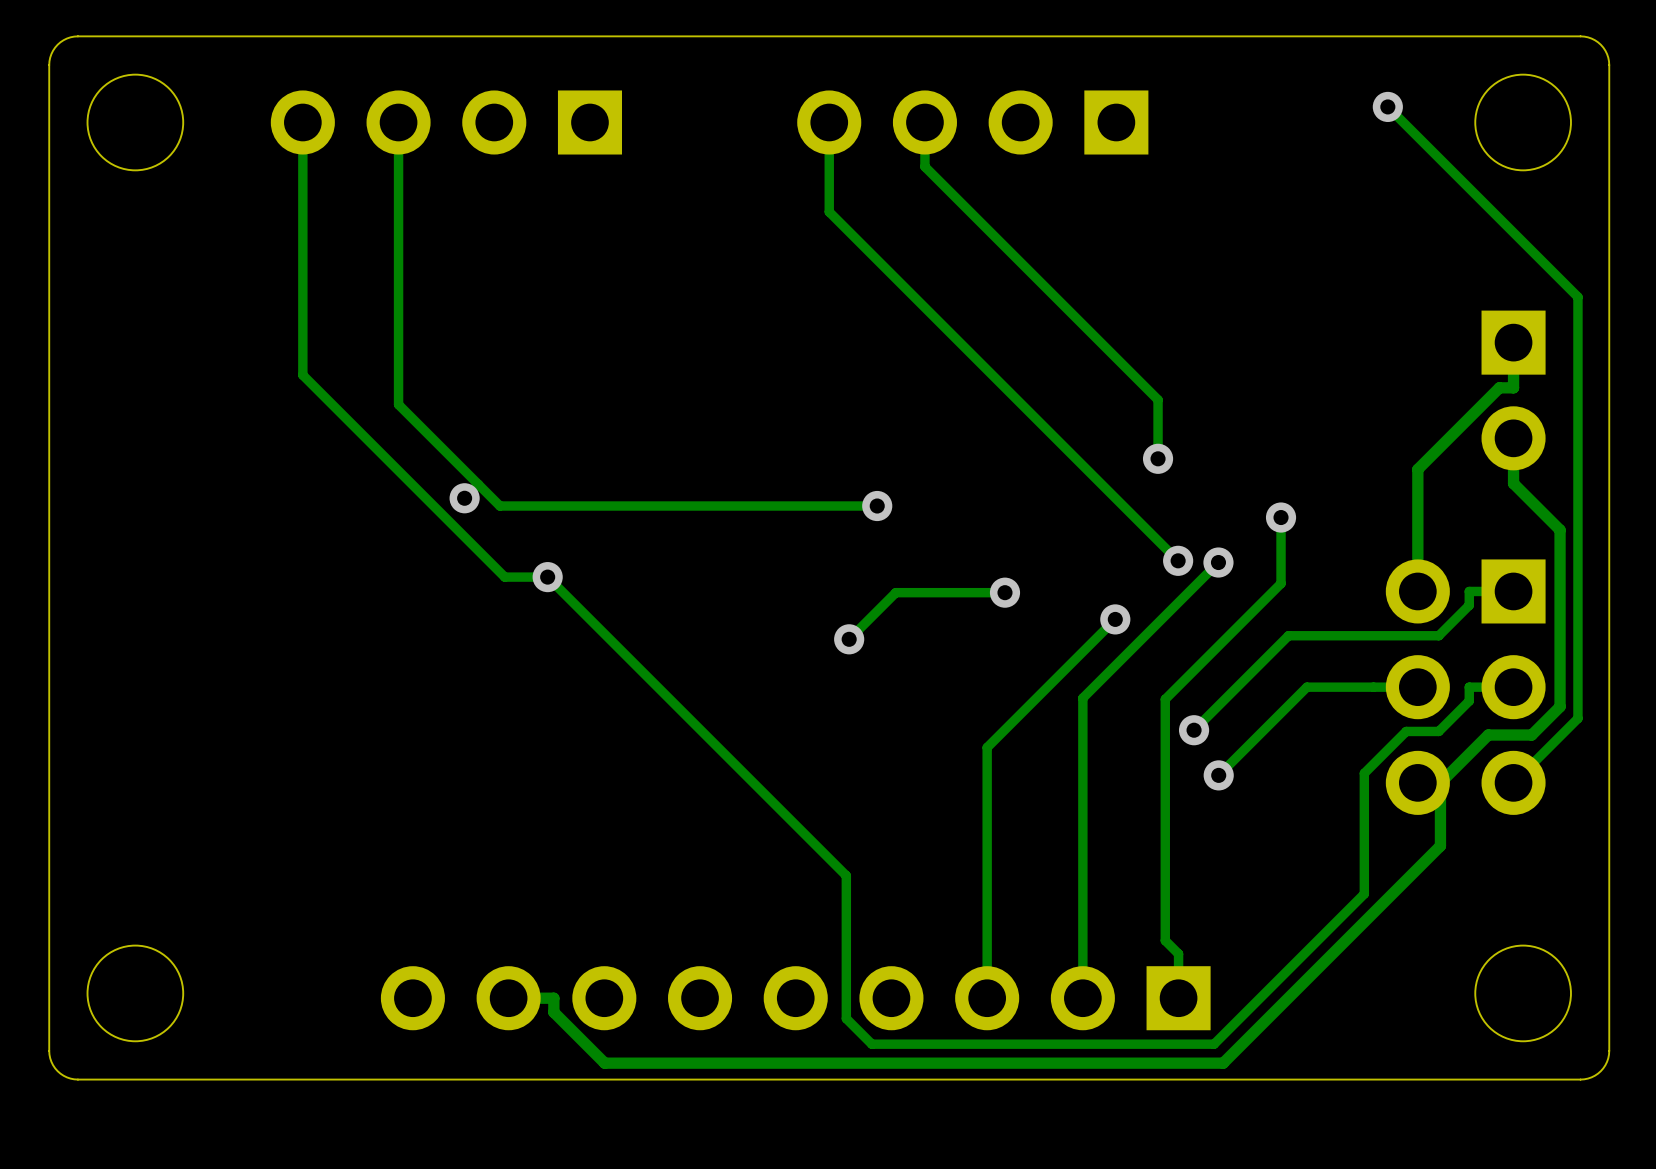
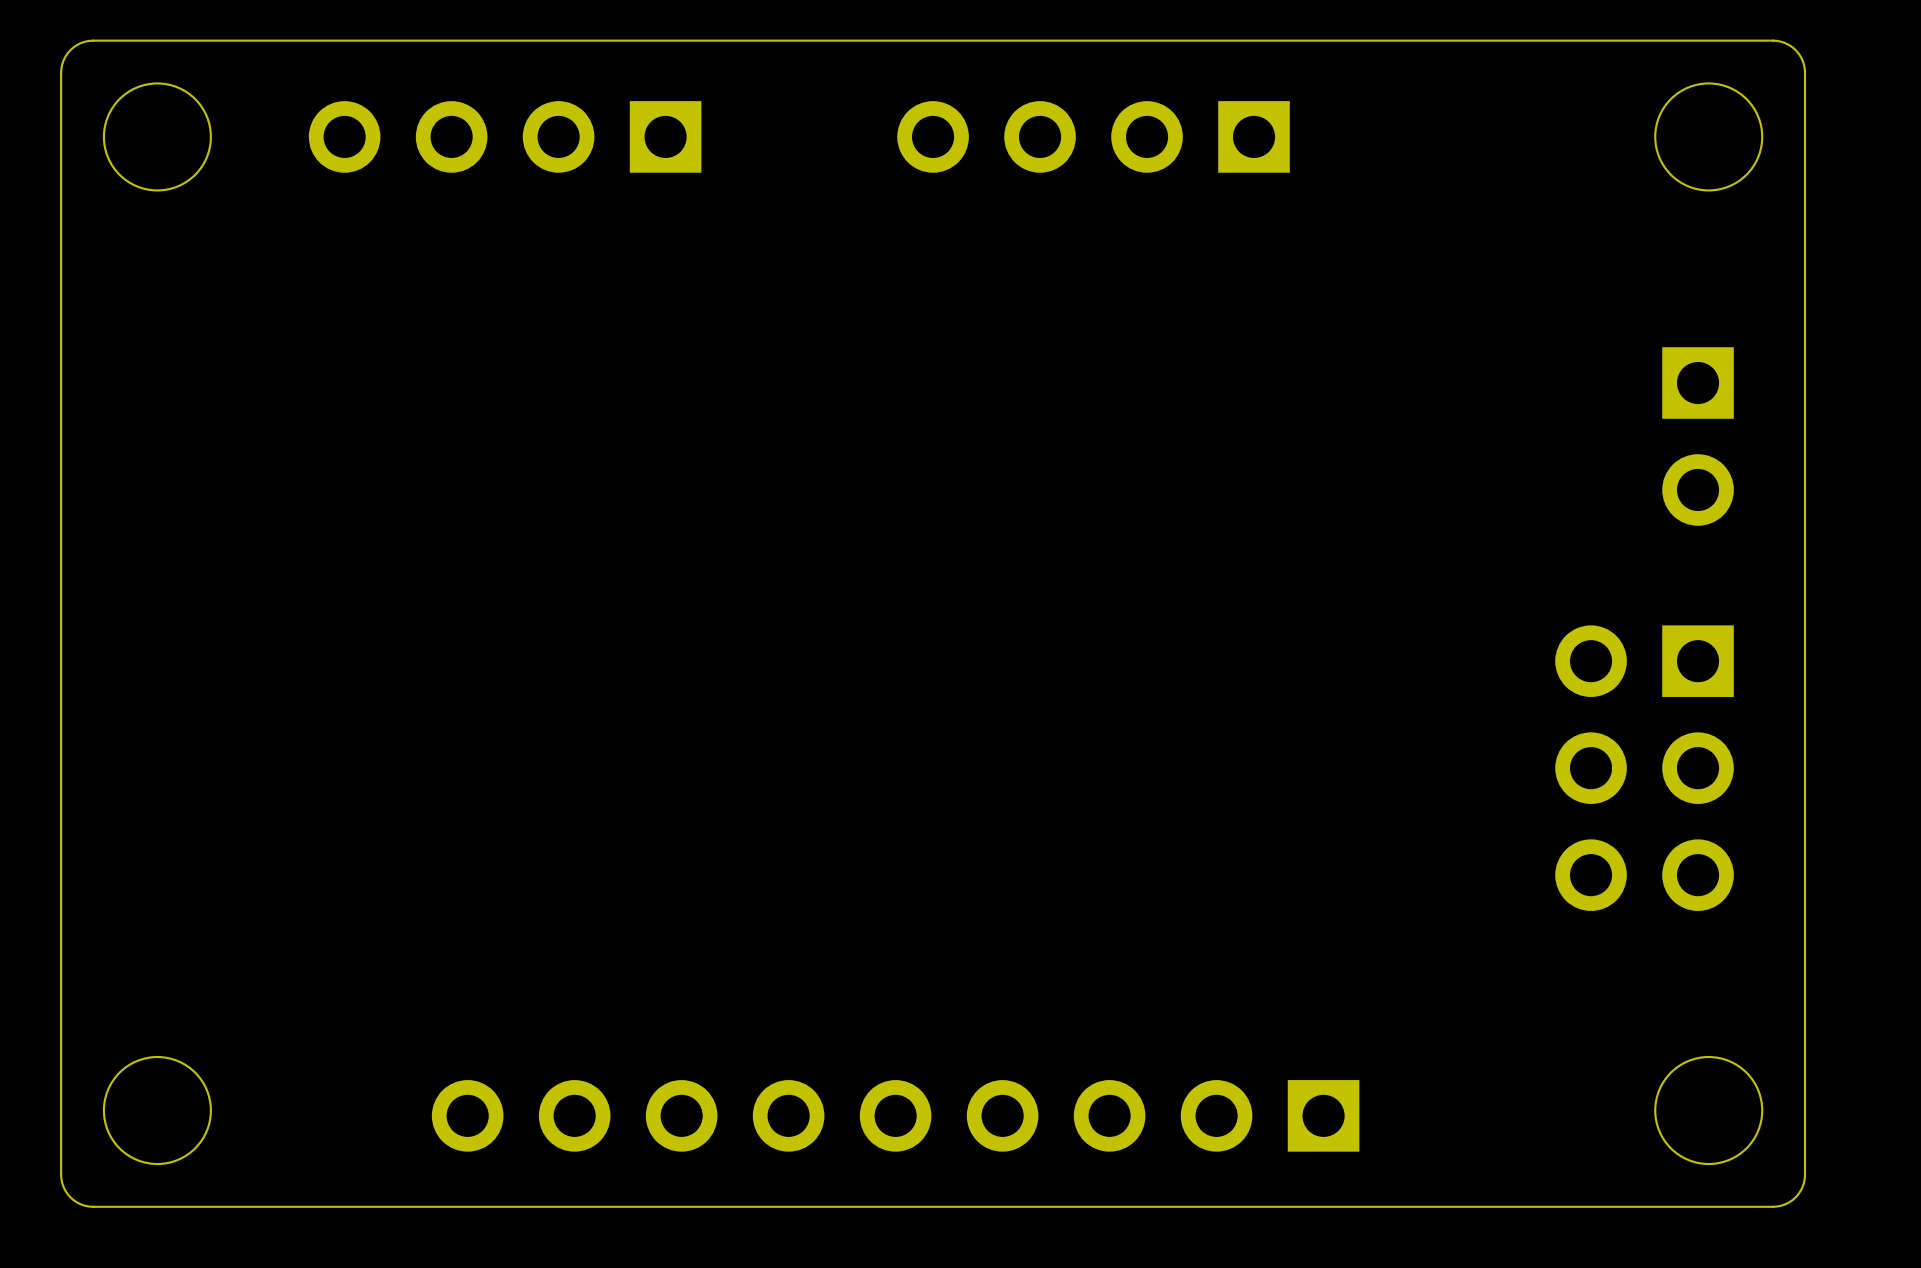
track: (1387, 106) (1577, 297) (1577, 718) (1513, 782) -> none
via: (1387, 106) -> none
track: (302, 122) (302, 375) (504, 577) (547, 577) (846, 875) (846, 1018) (871, 1044) (1214, 1044) (1364, 893) (1364, 773) (1406, 731) (1438, 731) (1469, 701) (1469, 687) (1513, 687) -> none
track: (398, 122) (398, 404) (499, 506) (877, 506) -> none
track: (829, 122) (829, 211) (1178, 560) -> none
track: (924, 122) (924, 166) (1158, 399) (1158, 458) -> none
track: (1513, 342) (1513, 387) (1499, 387) (1417, 469) (1417, 591) -> none
track: (1513, 438) (1513, 483) (1560, 530) (1560, 706) (1531, 735) (1488, 735) (1440, 782) -> none
via: (1158, 458) -> none
via: (464, 498) -> none
via: (877, 506) -> none
track: (1281, 517) (1281, 583) (1165, 699) (1165, 940) (1178, 953) (1178, 998) -> none
via: (1281, 517) -> none
via: (1178, 560) -> none
track: (1218, 562) (1082, 698) (1082, 998) -> none
via: (1218, 562) -> none
via: (547, 577) -> none
track: (1513, 591) (1469, 591) (1469, 605) (1438, 635) (1288, 635) (1194, 730) -> none
track: (1004, 592) (895, 592) (849, 639) -> none
via: (1004, 592) -> none
track: (1115, 619) (987, 747) (987, 998) -> none
via: (1115, 619) -> none
via: (849, 639) -> none
track: (1417, 687) (1306, 687) (1218, 775) -> none
via: (1194, 730) -> none
via: (1218, 775) -> none
track: (1440, 782) (1440, 845) (1223, 1063) (604, 1063) (553, 1012) (553, 998) (508, 998) -> none

